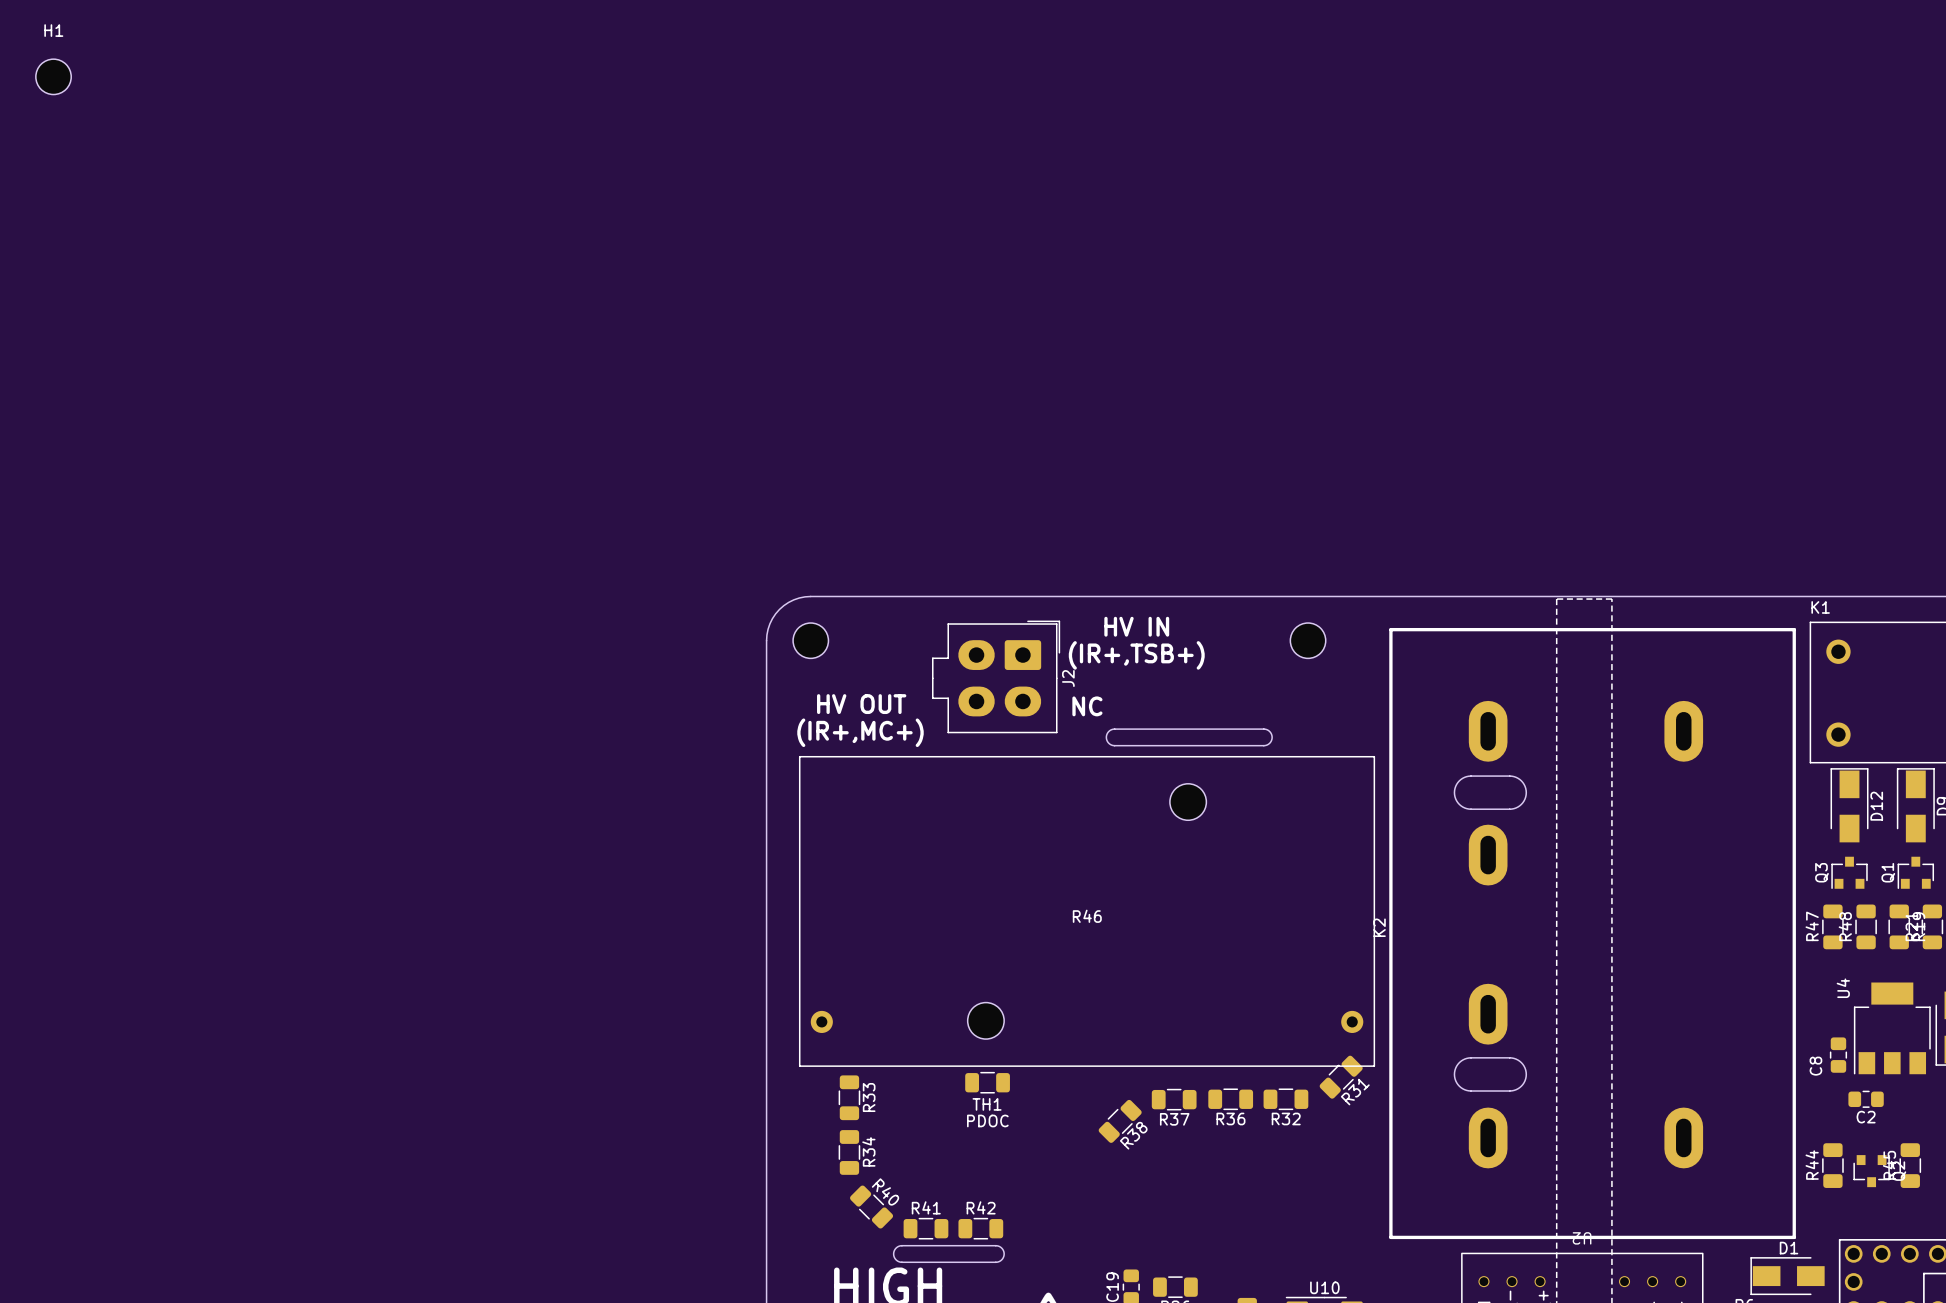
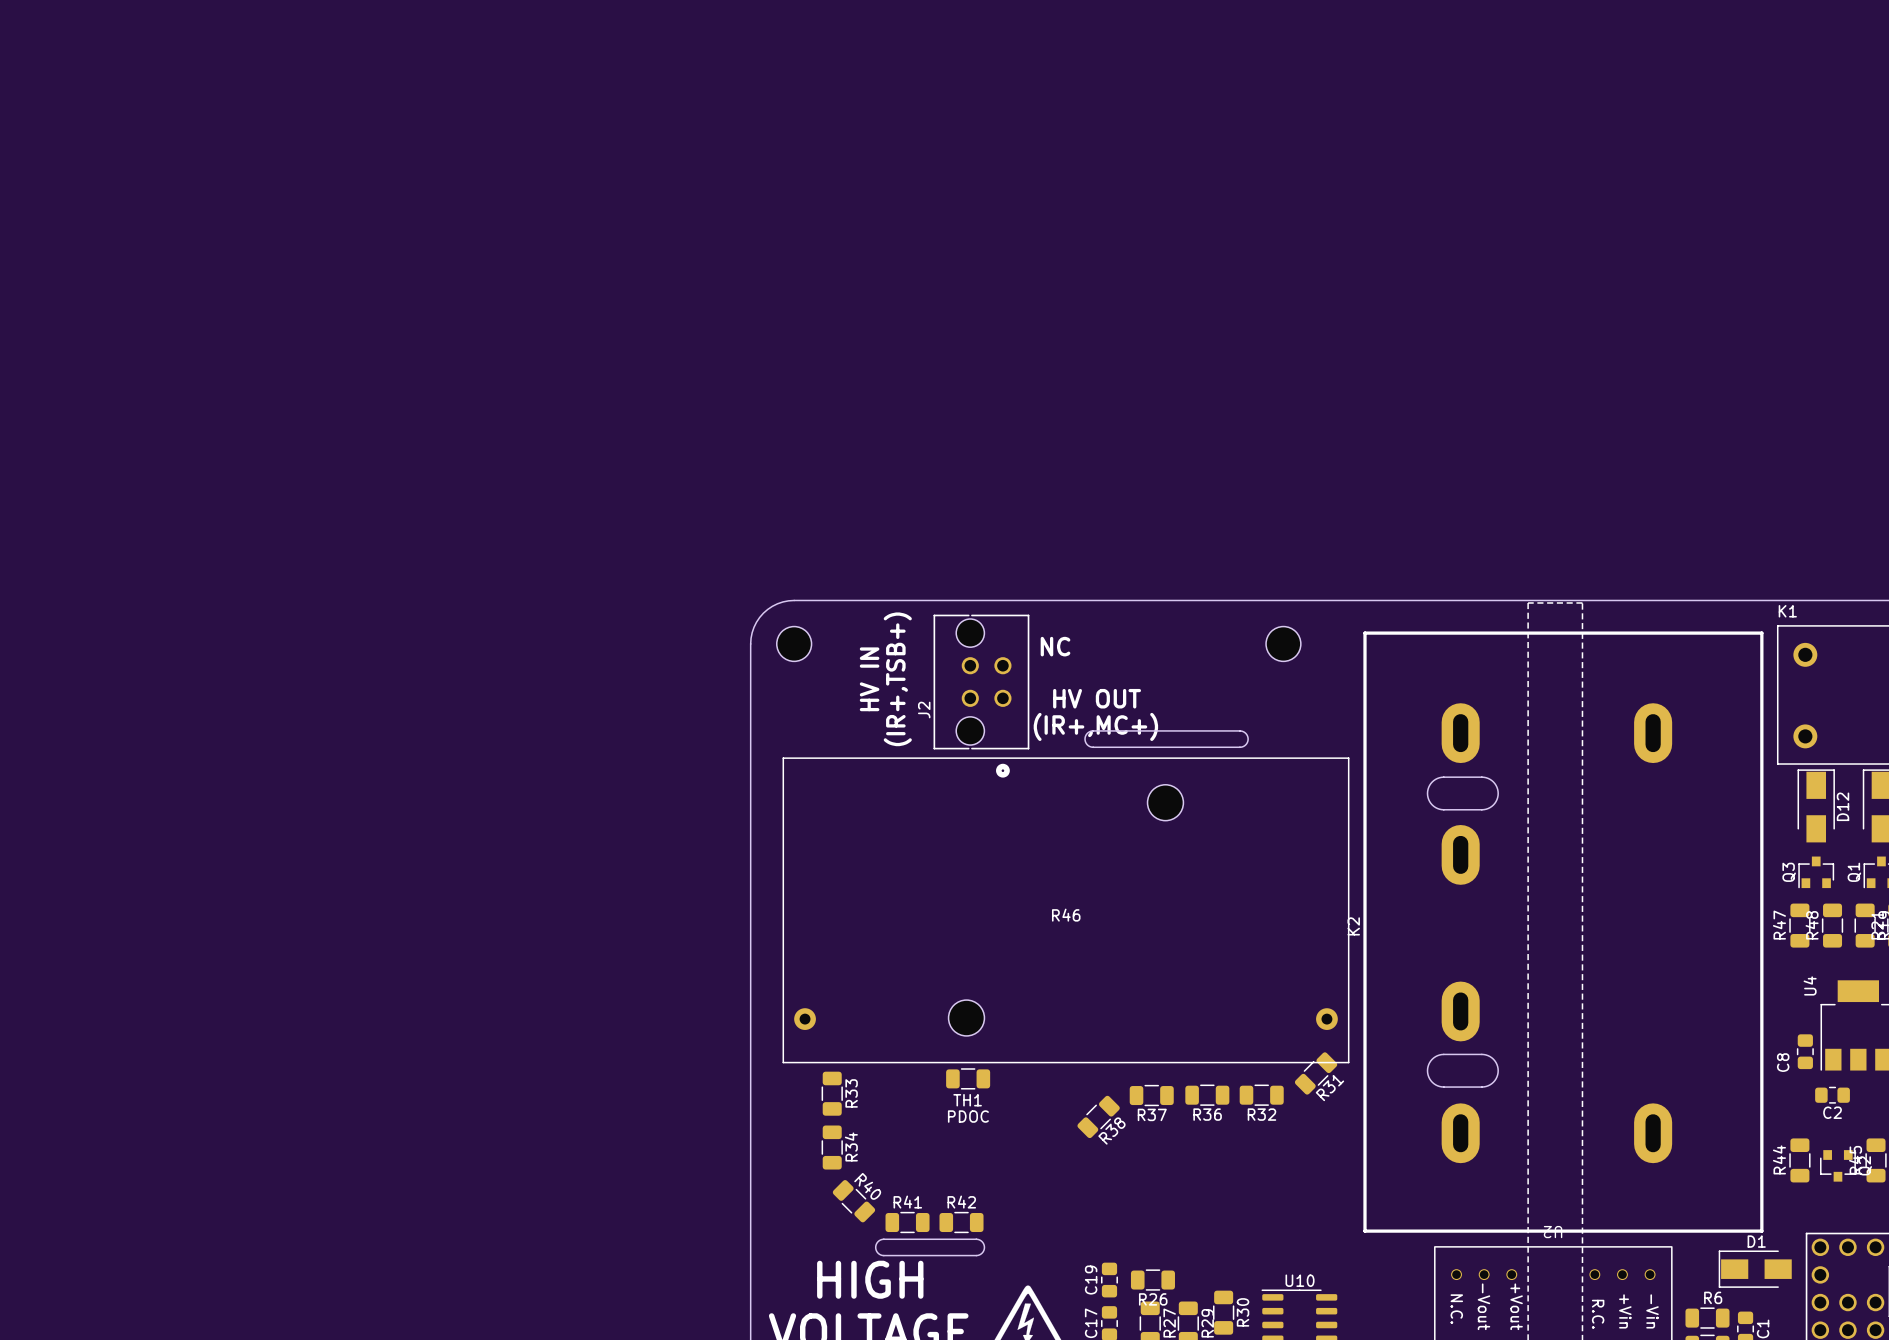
H1: (53, 76) -> none
J2 footprint: [932, 620, 1061, 734] -> [933, 614, 1030, 778]
text rotation: 0° (1136, 626) -> 90° counterclockwise (869, 679)
text position: HV IN (1136, 626) -> HV IN (869, 679)
text rotation: 0° (1136, 655) -> 90° counterclockwise (897, 679)
text position: (IR+,TSB+) (1136, 655) -> (IR+,TSB+) (897, 679)
J2 name position: J2 (1068, 678) -> J2 (924, 710)
text position: HV OUT (861, 704) -> HV OUT (1097, 698)
text position: NC (1087, 706) -> NC (1055, 646)
text position: (IR+,MC+) (860, 732) -> (IR+,MC+) (1095, 726)

